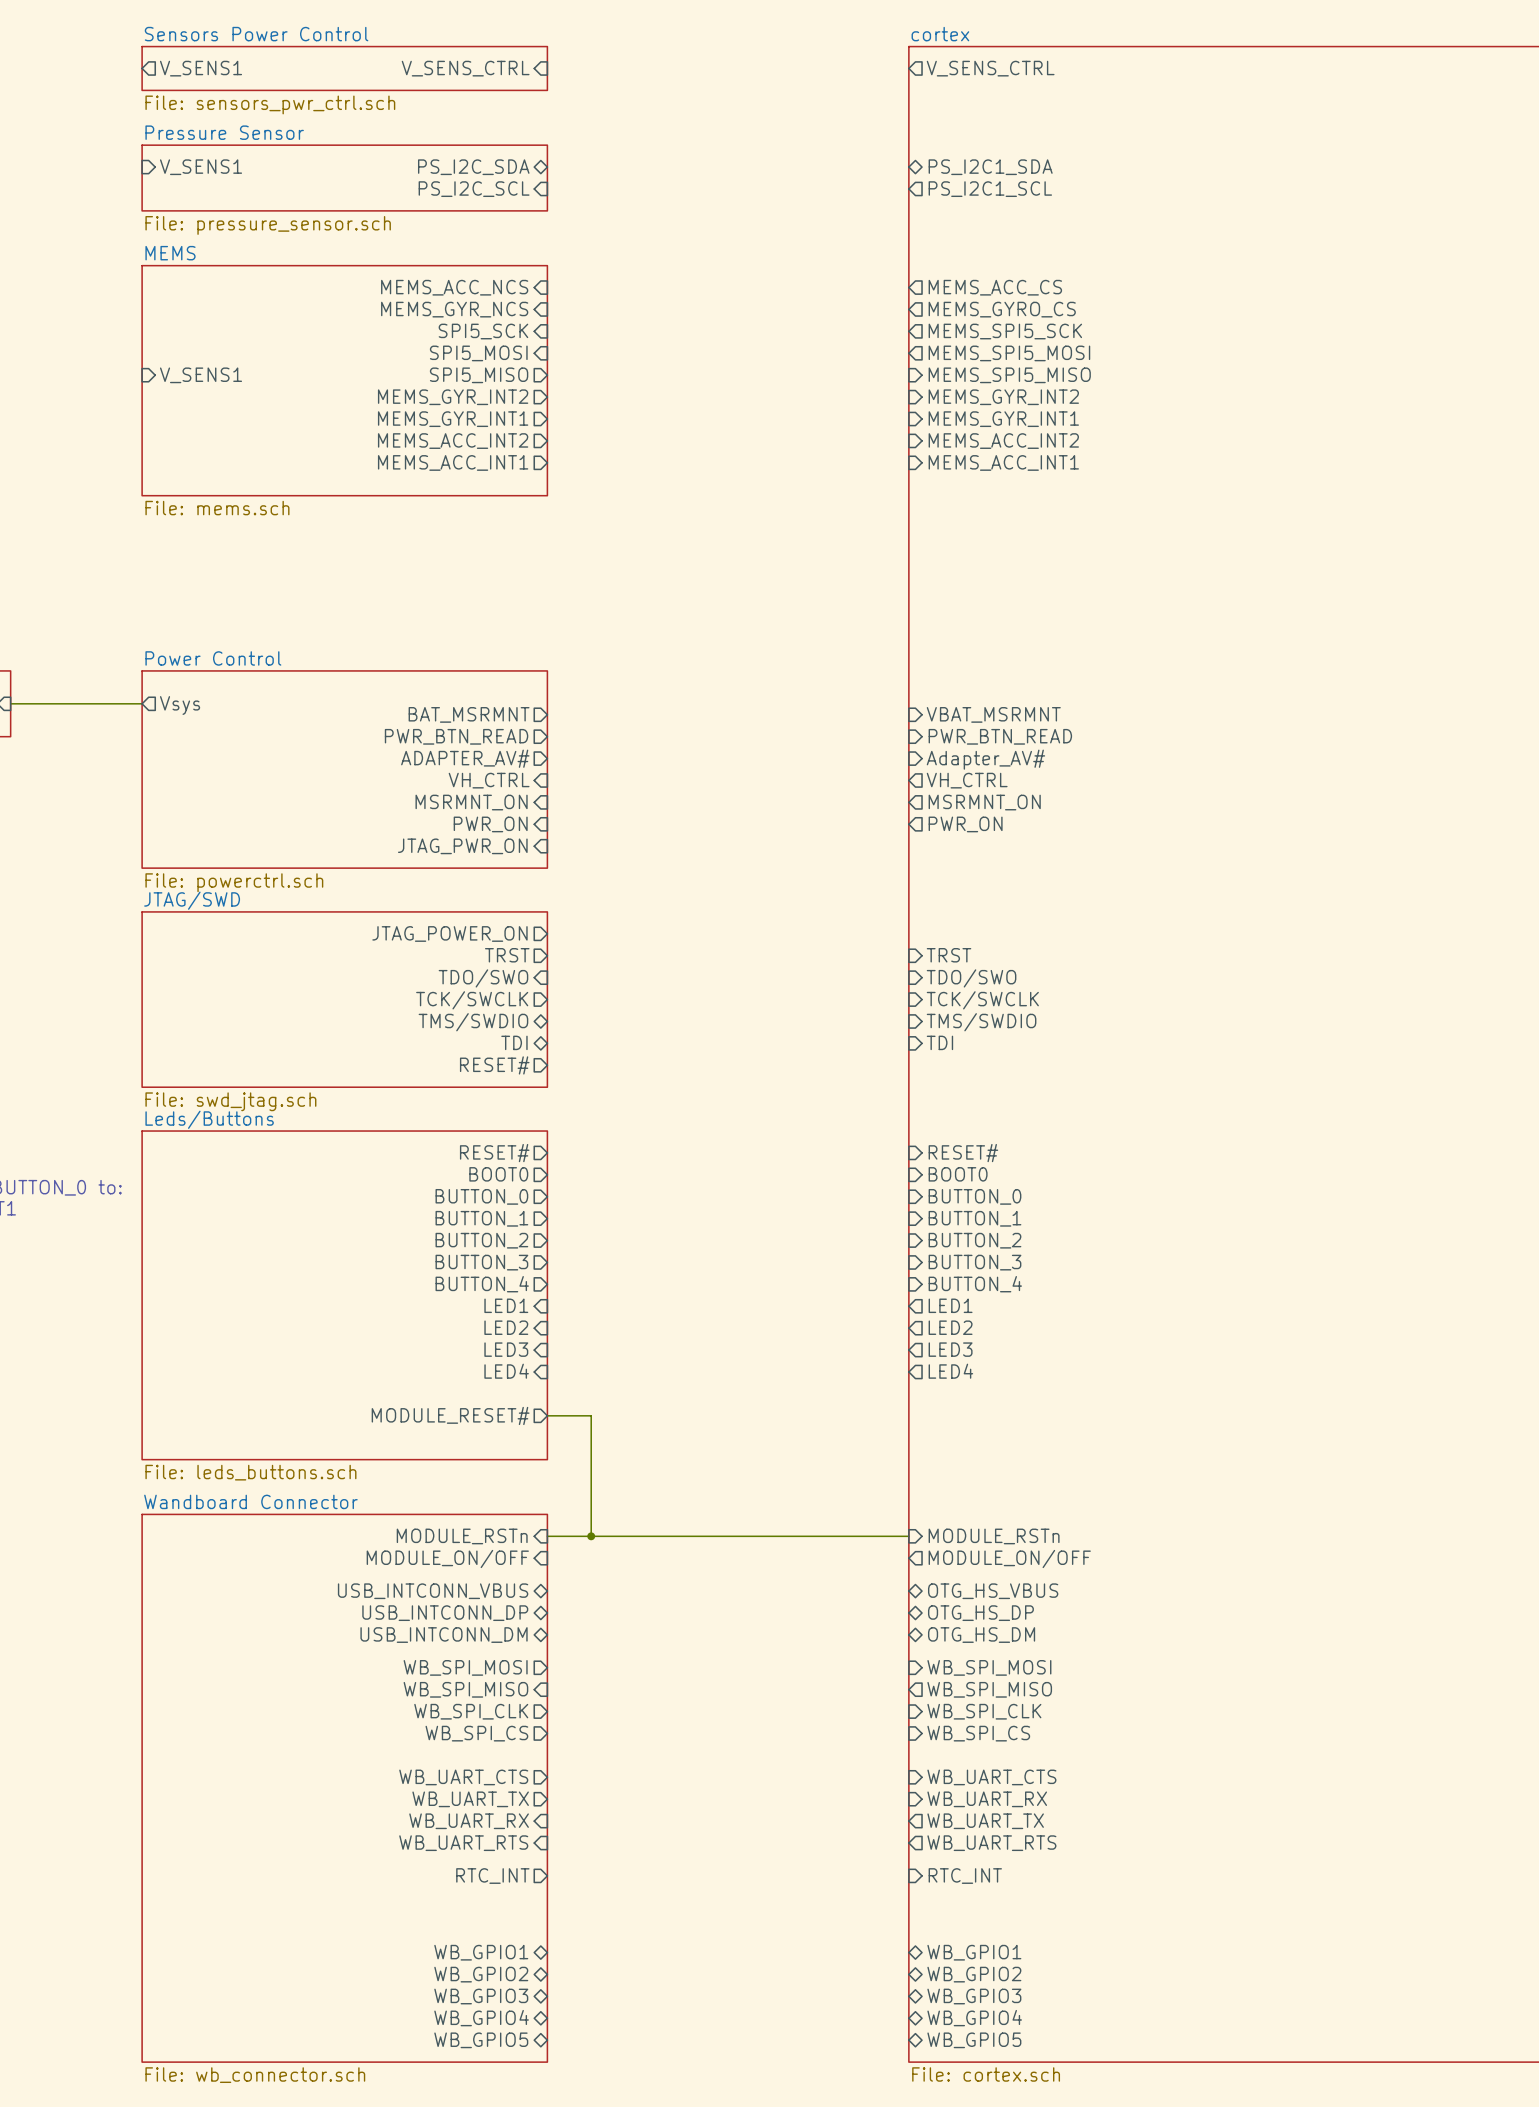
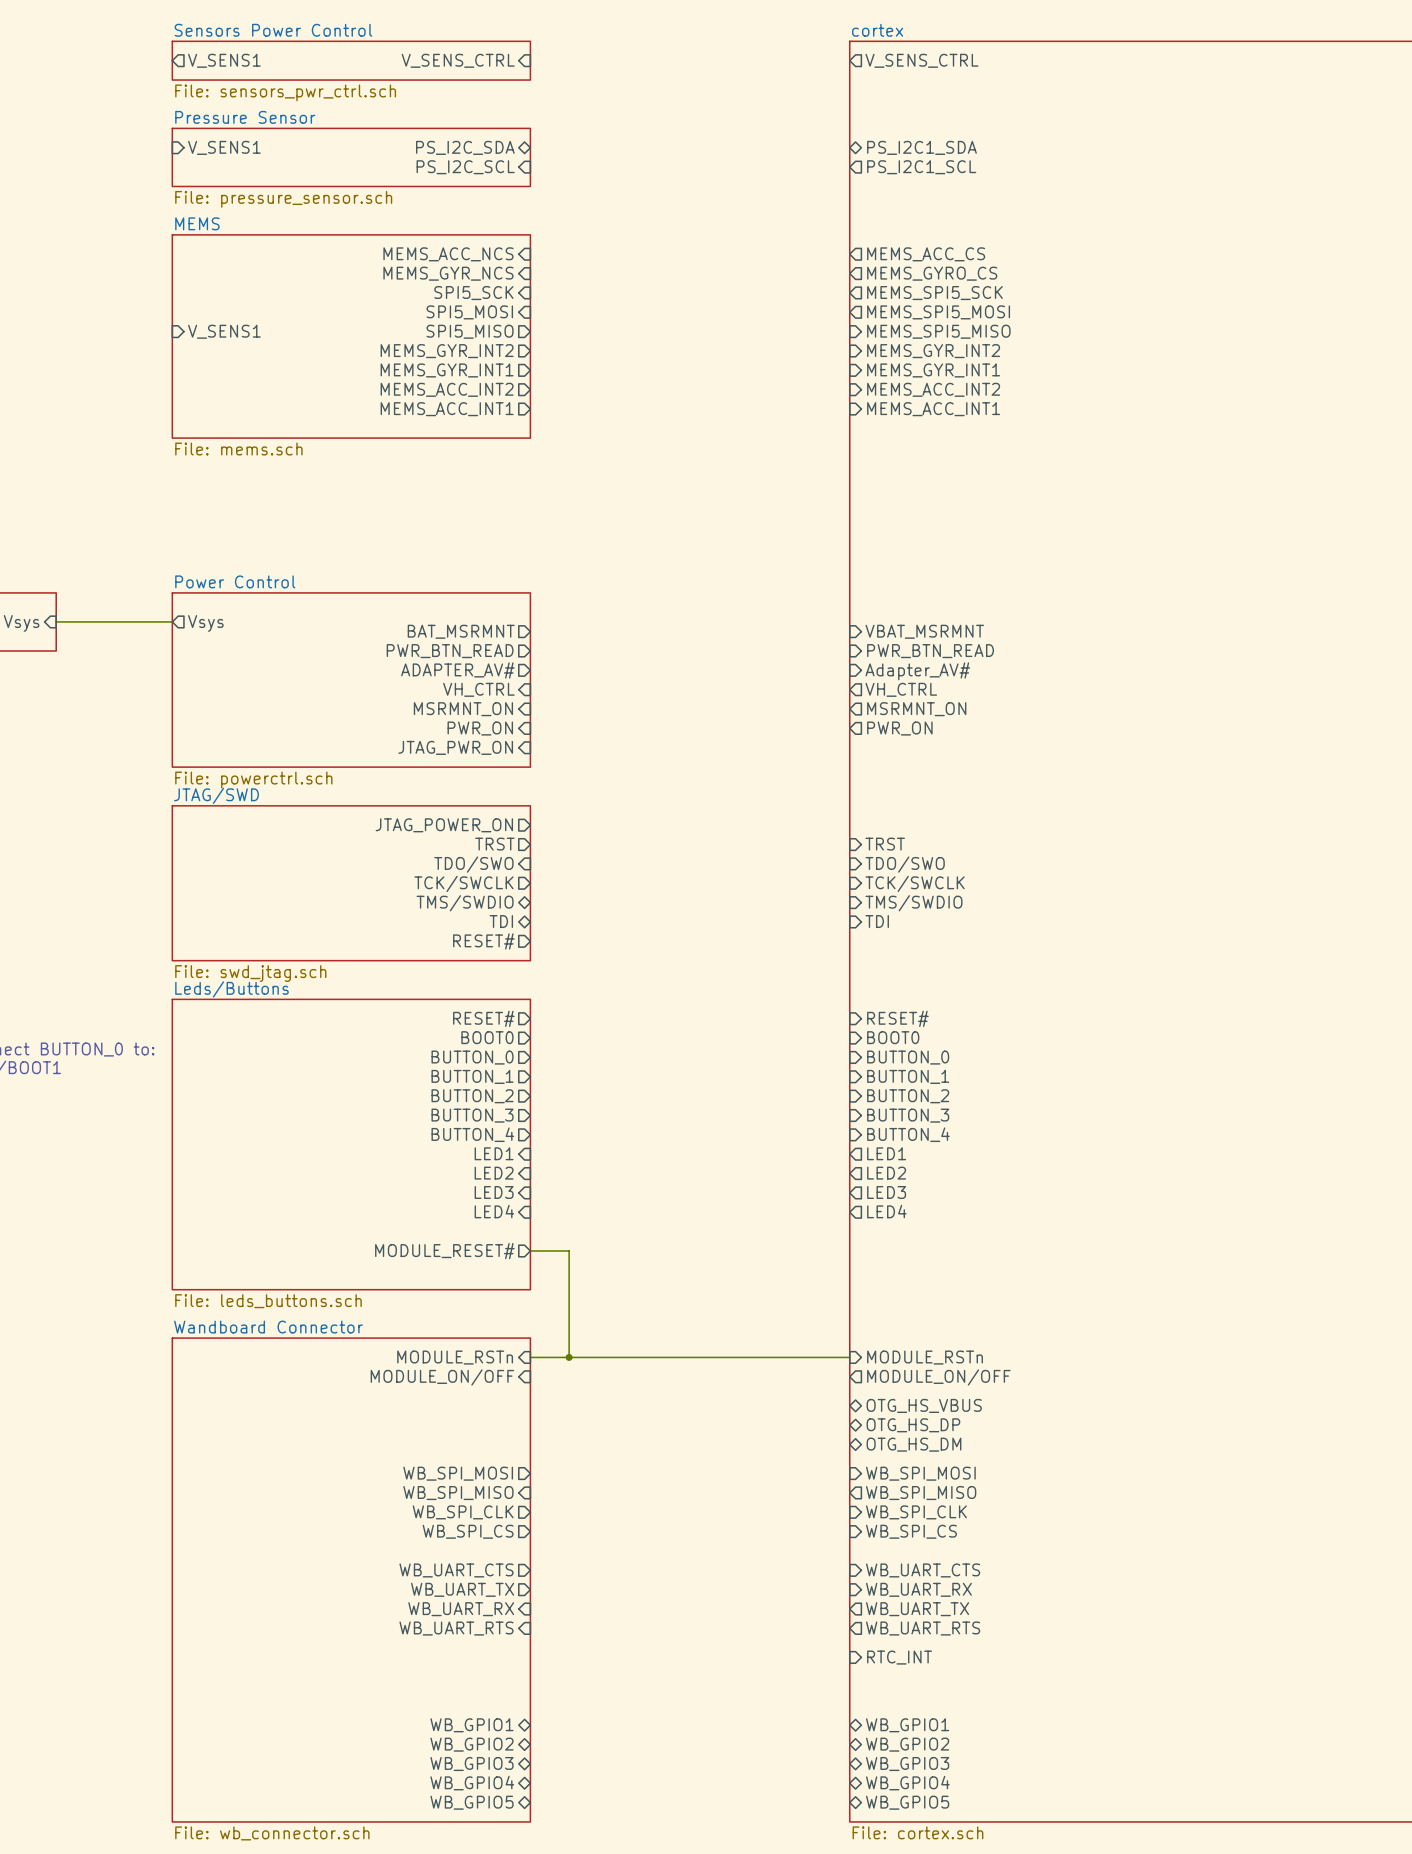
sheet pin: USB_INTCONN_VBUS (433, 1591) -> none
sheet pin: USB_INTCONN_DP (445, 1613) -> none
sheet pin: USB_INTCONN_DM (444, 1635) -> none
sheet pin: RTC_INT (492, 1876) -> none

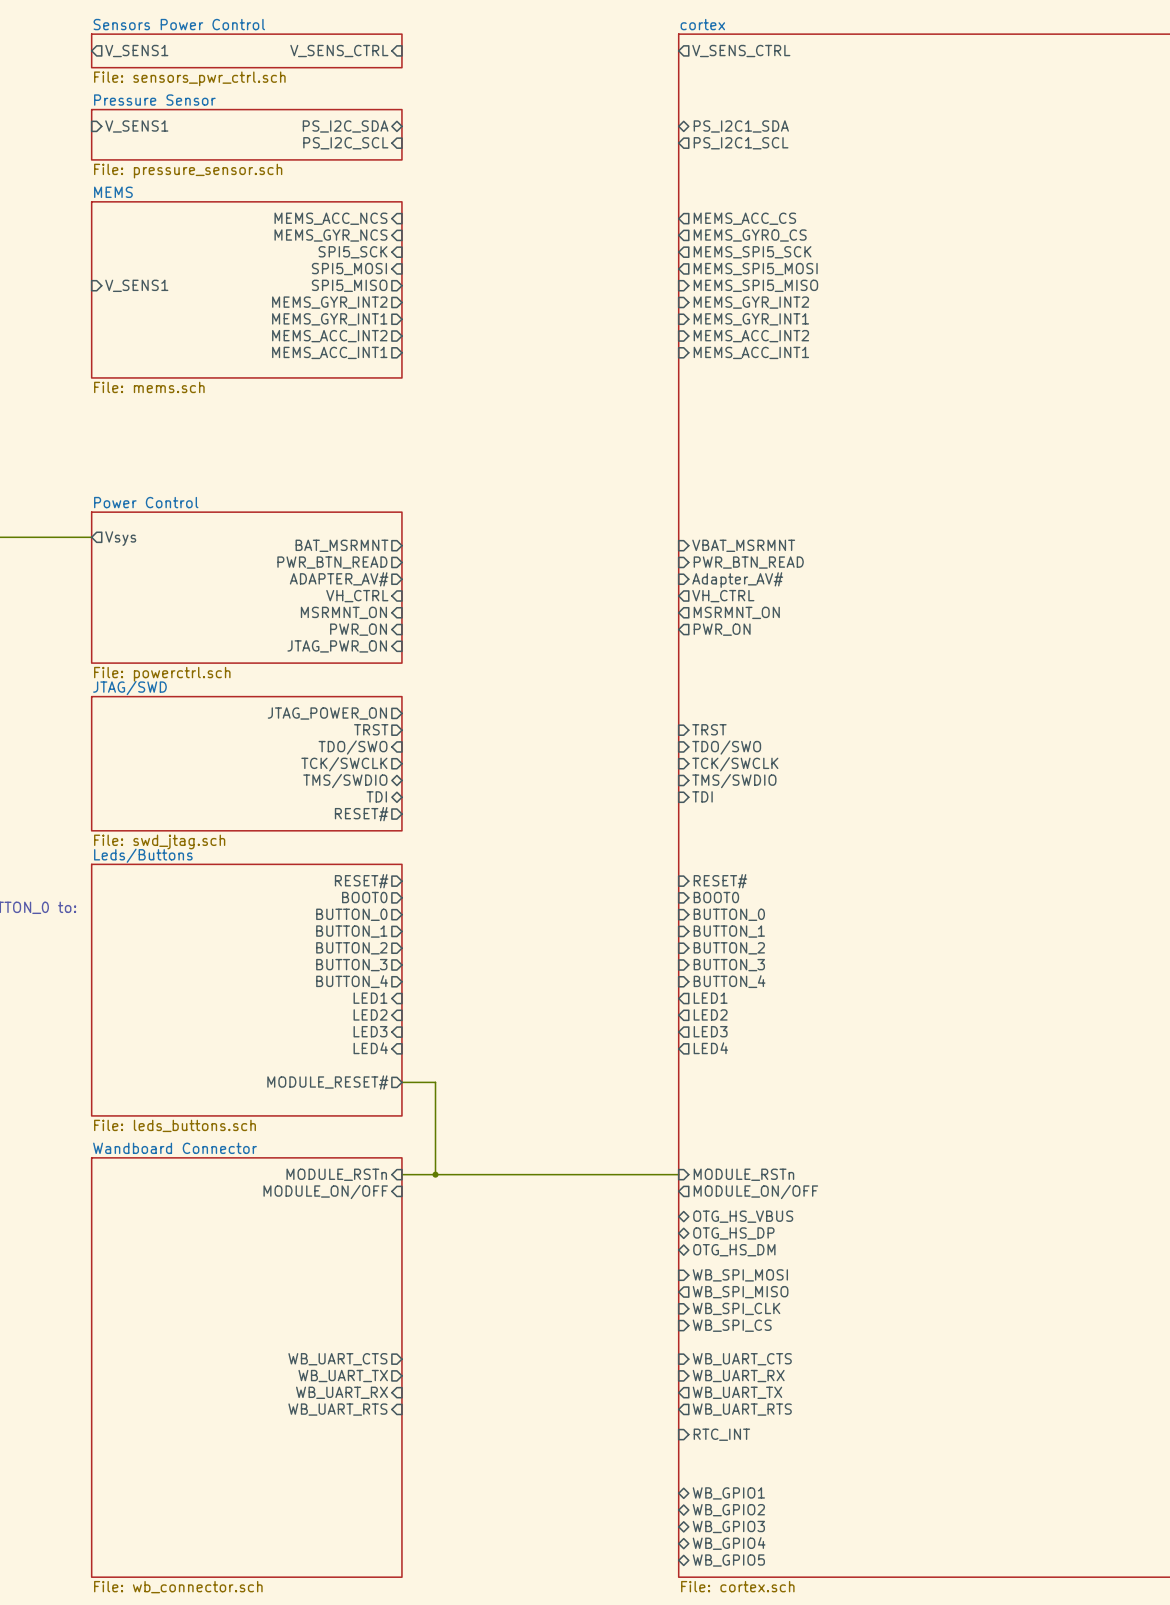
sheet pin: WB_SPI_MOSI (458, 1473) -> none
sheet pin: WB_SPI_MISO (458, 1493) -> none
sheet pin: WB_SPI_CLK (463, 1512) -> none
sheet pin: WB_SPI_CS (468, 1531) -> none
sheet pin: WB_GPIO1 (471, 1725) -> none
sheet pin: WB_GPIO2 (471, 1744) -> none
sheet pin: WB_GPIO3 (471, 1764) -> none
sheet pin: WB_GPIO4 (472, 1783) -> none
sheet pin: WB_GPIO5 (471, 1802) -> none

